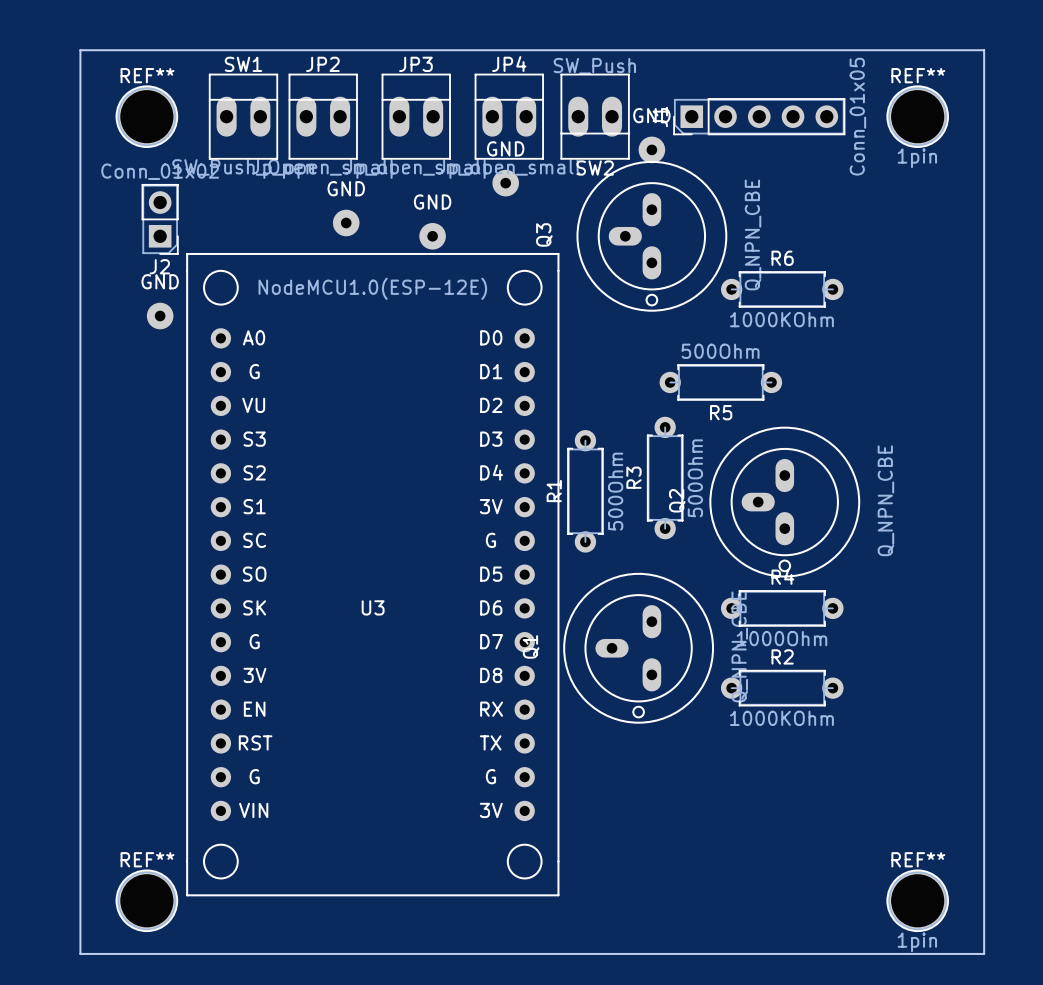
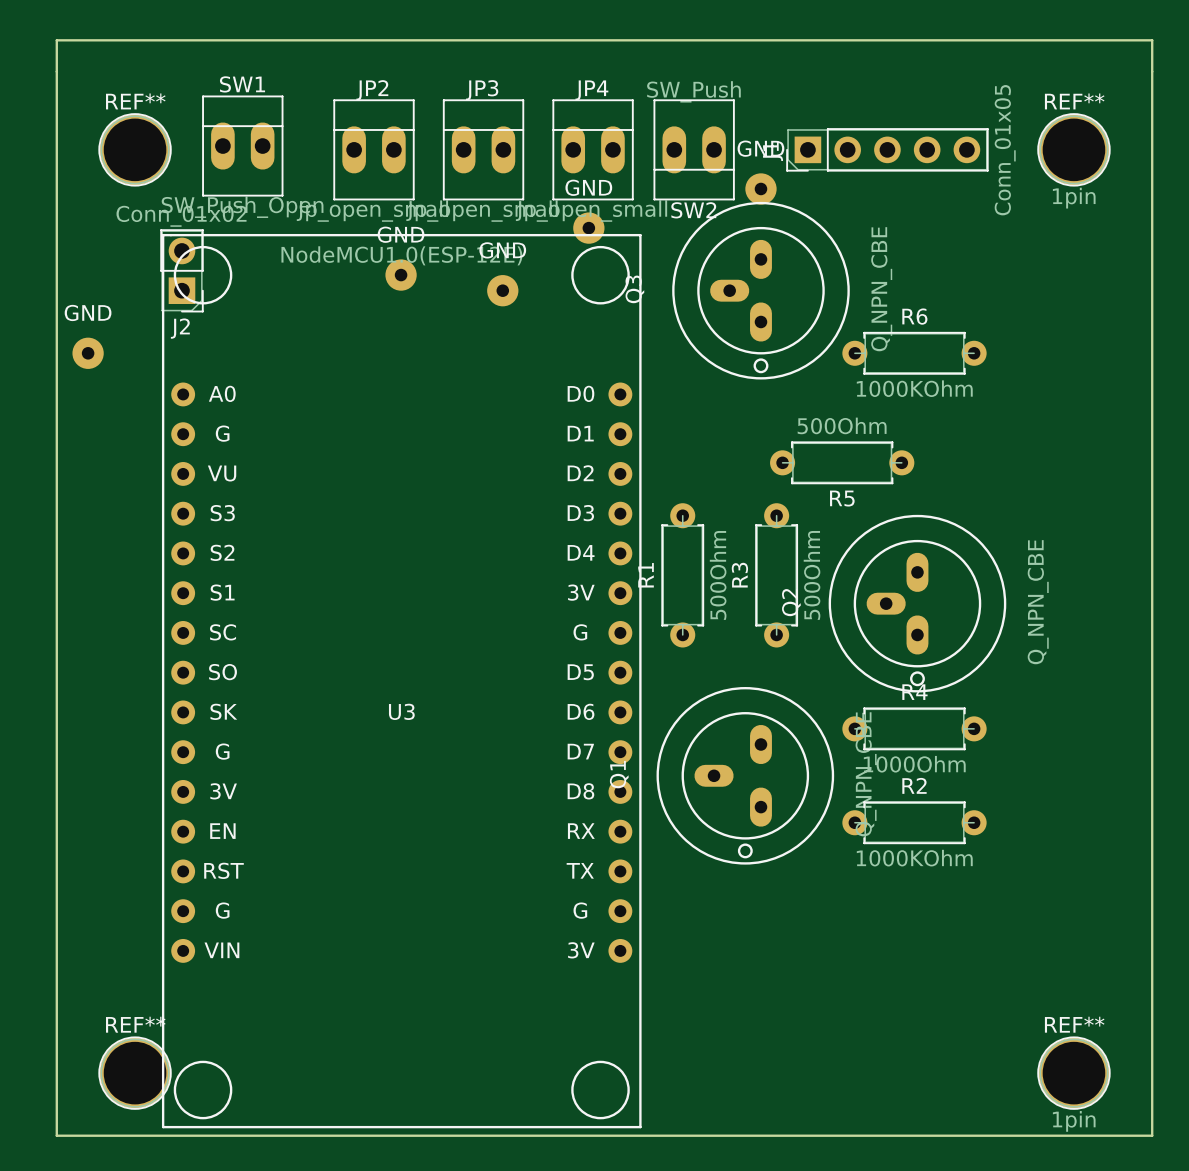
board edge: (984, 50) (80, 50) (80, 953) -> (1152, 71) (1152, 40) (56, 40) (56, 1135) (88, 1135)
REF** position: (146, 116) -> (135, 149)
SW1 position: (243, 116) -> (242, 146)
U3 footprint: [186, 252, 560, 897] -> [161, 233, 642, 1129]
U3 value position: NodeMCU1.0(ESP-12E) (372, 288) -> NodeMCU1.0(ESP-12E) (401, 255)
GND position: (160, 316) -> (88, 353)
R1 position: (585, 491) -> (682, 575)
REF** position: (146, 900) -> (135, 1073)

